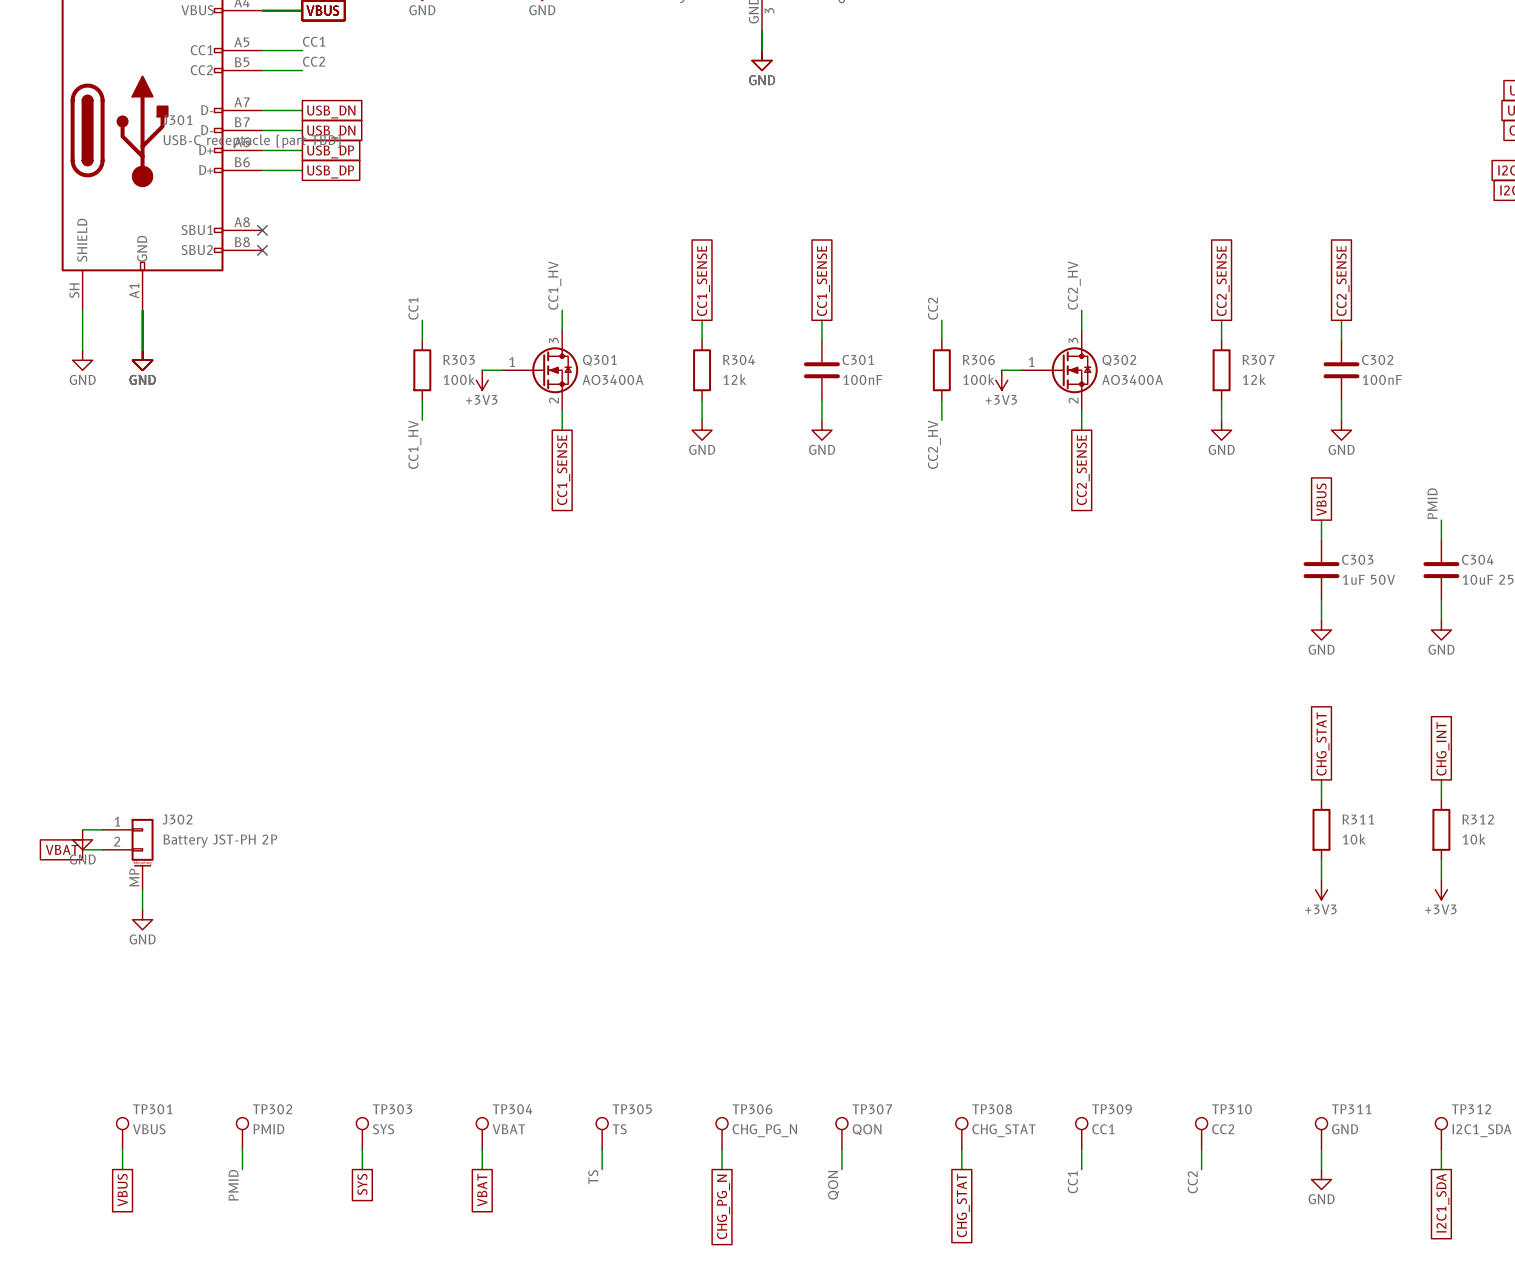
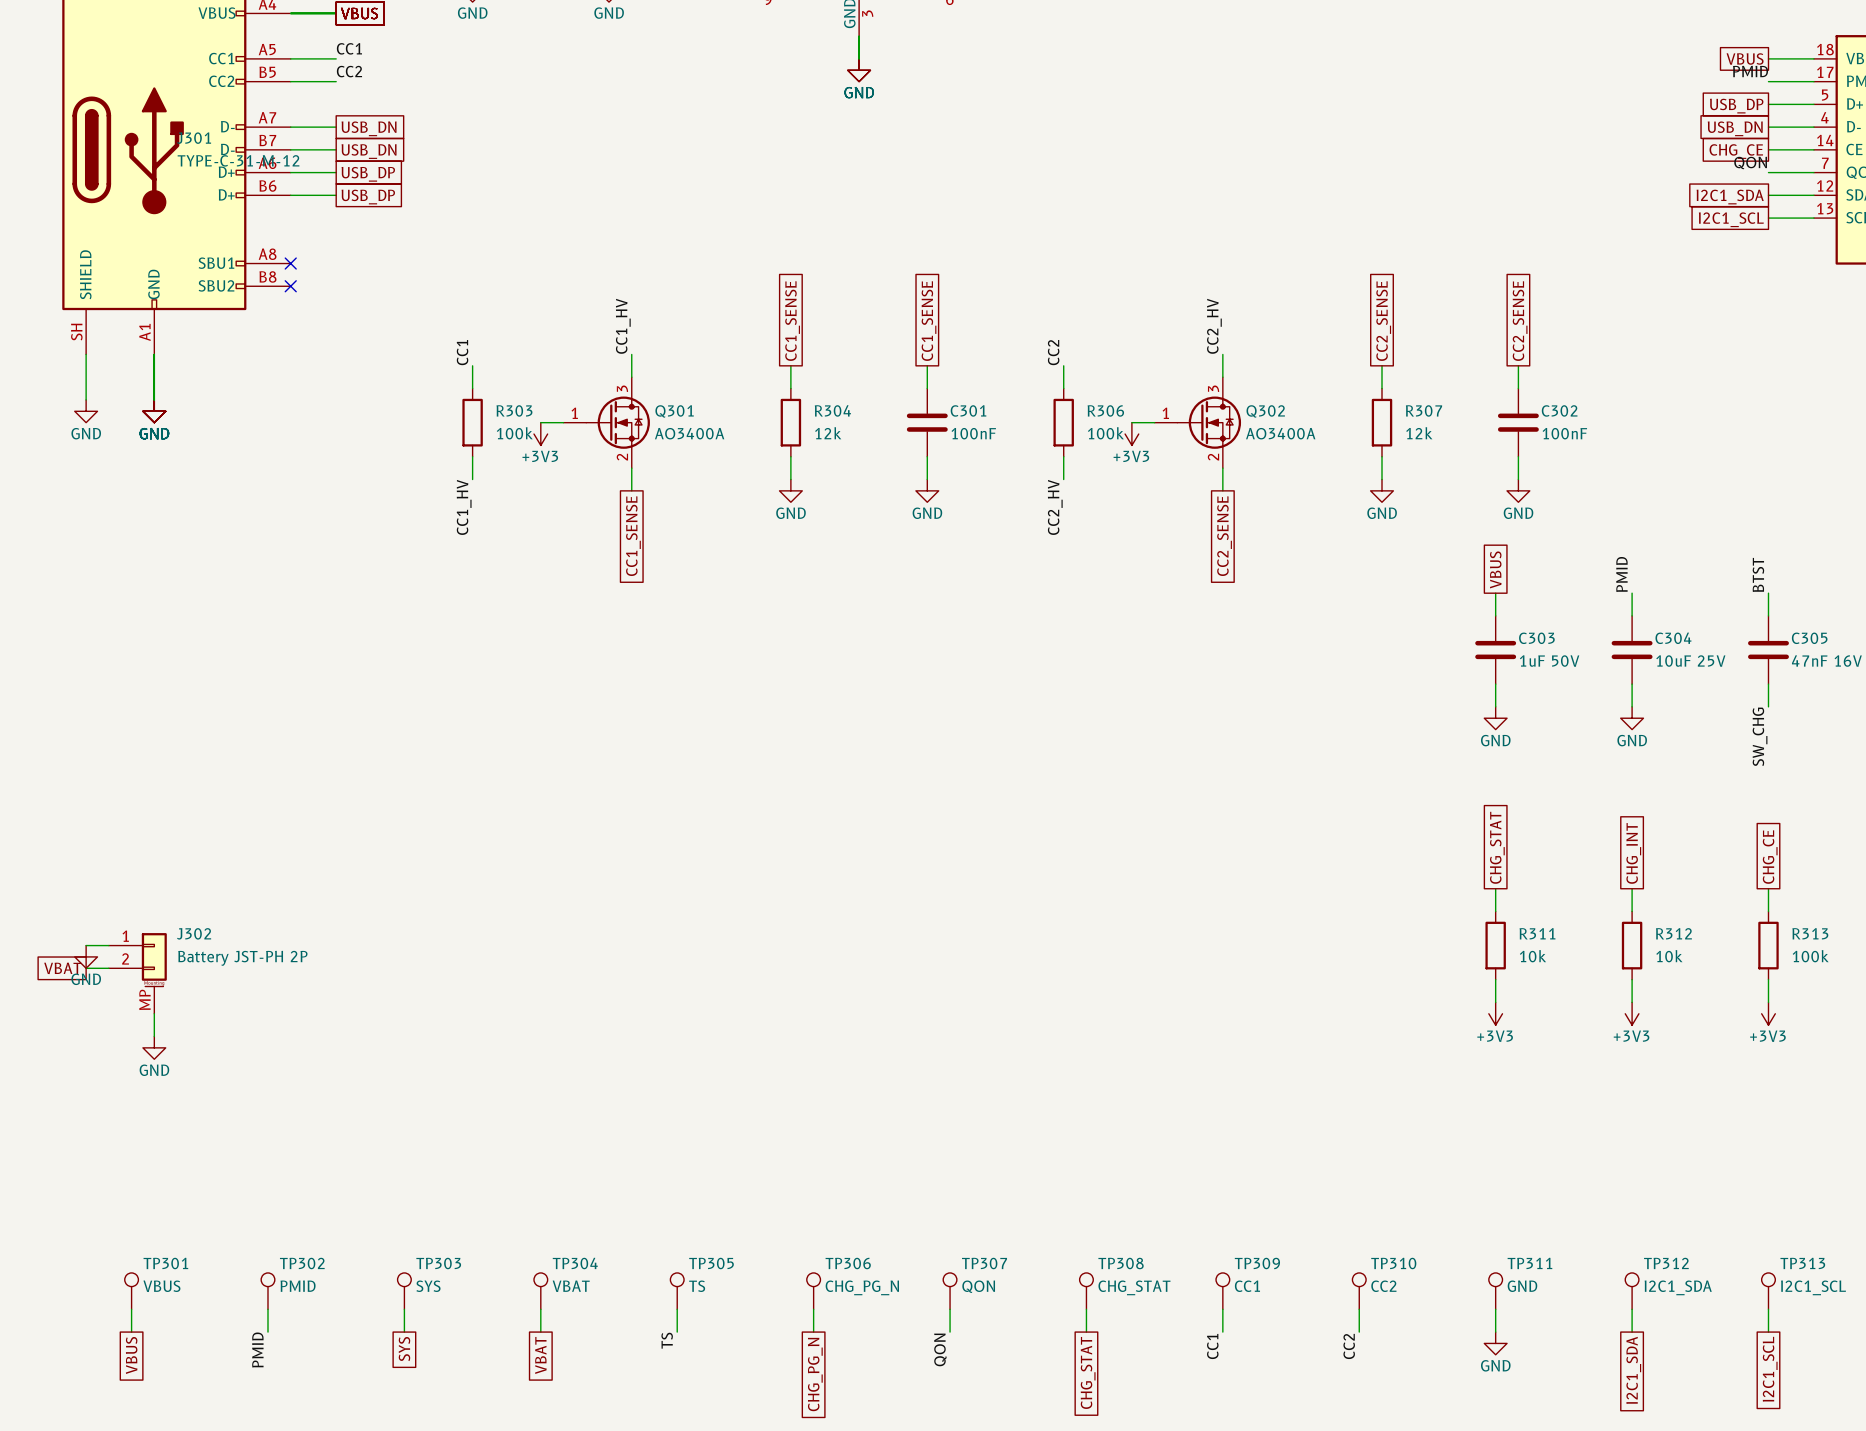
J301 value: USB-C receptacle (part TBD) (252, 141) -> TYPE-C-31-M-12 (238, 160)

